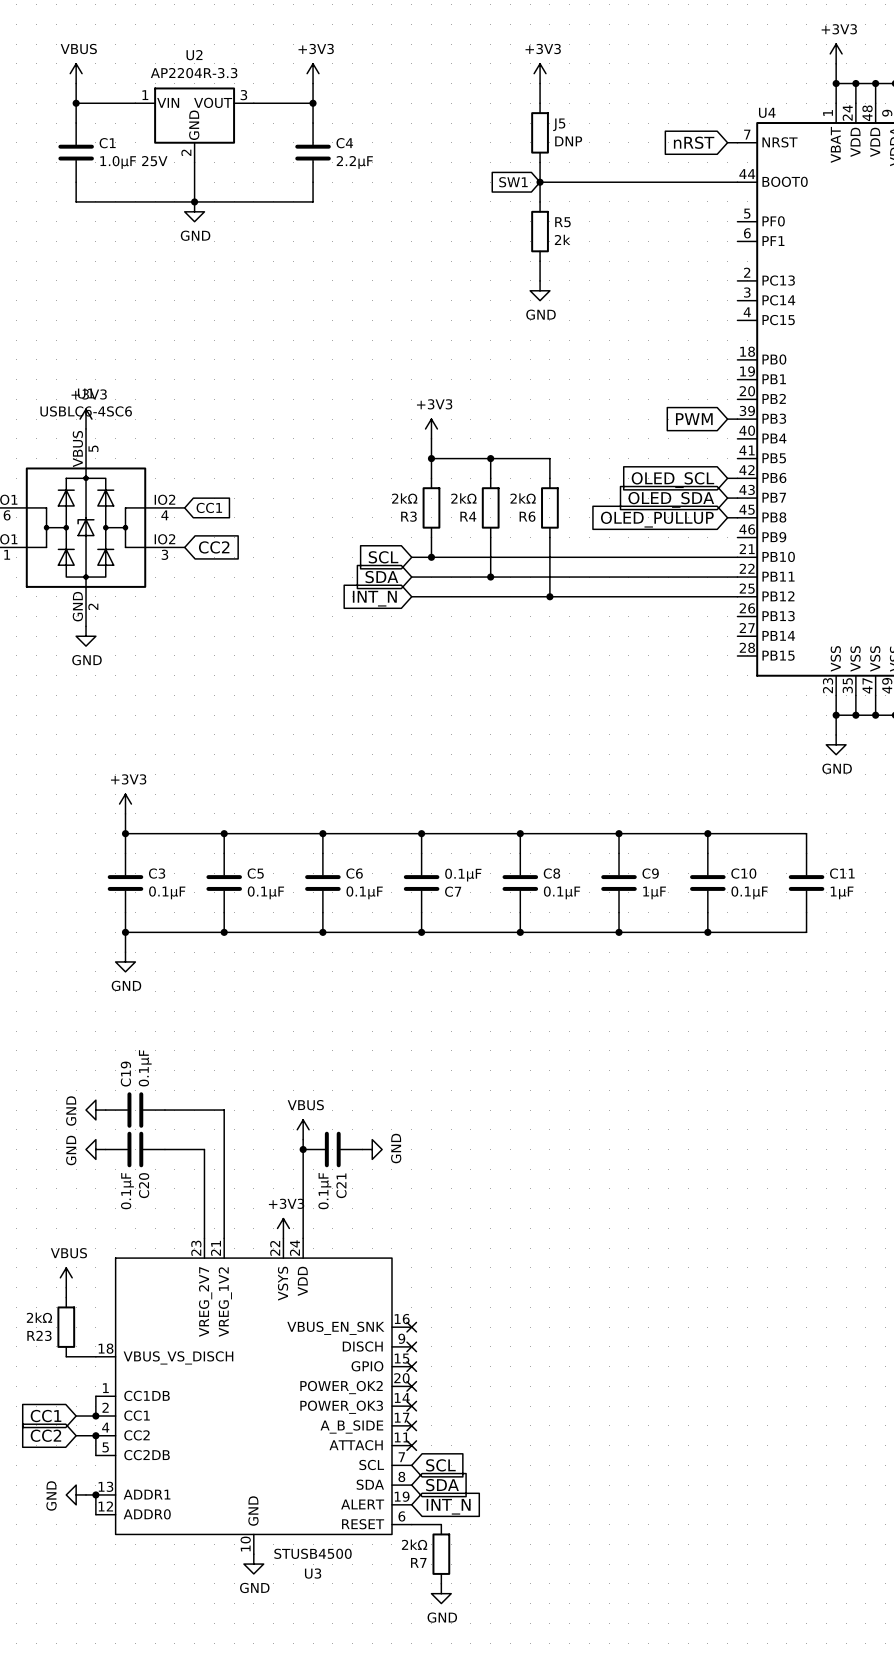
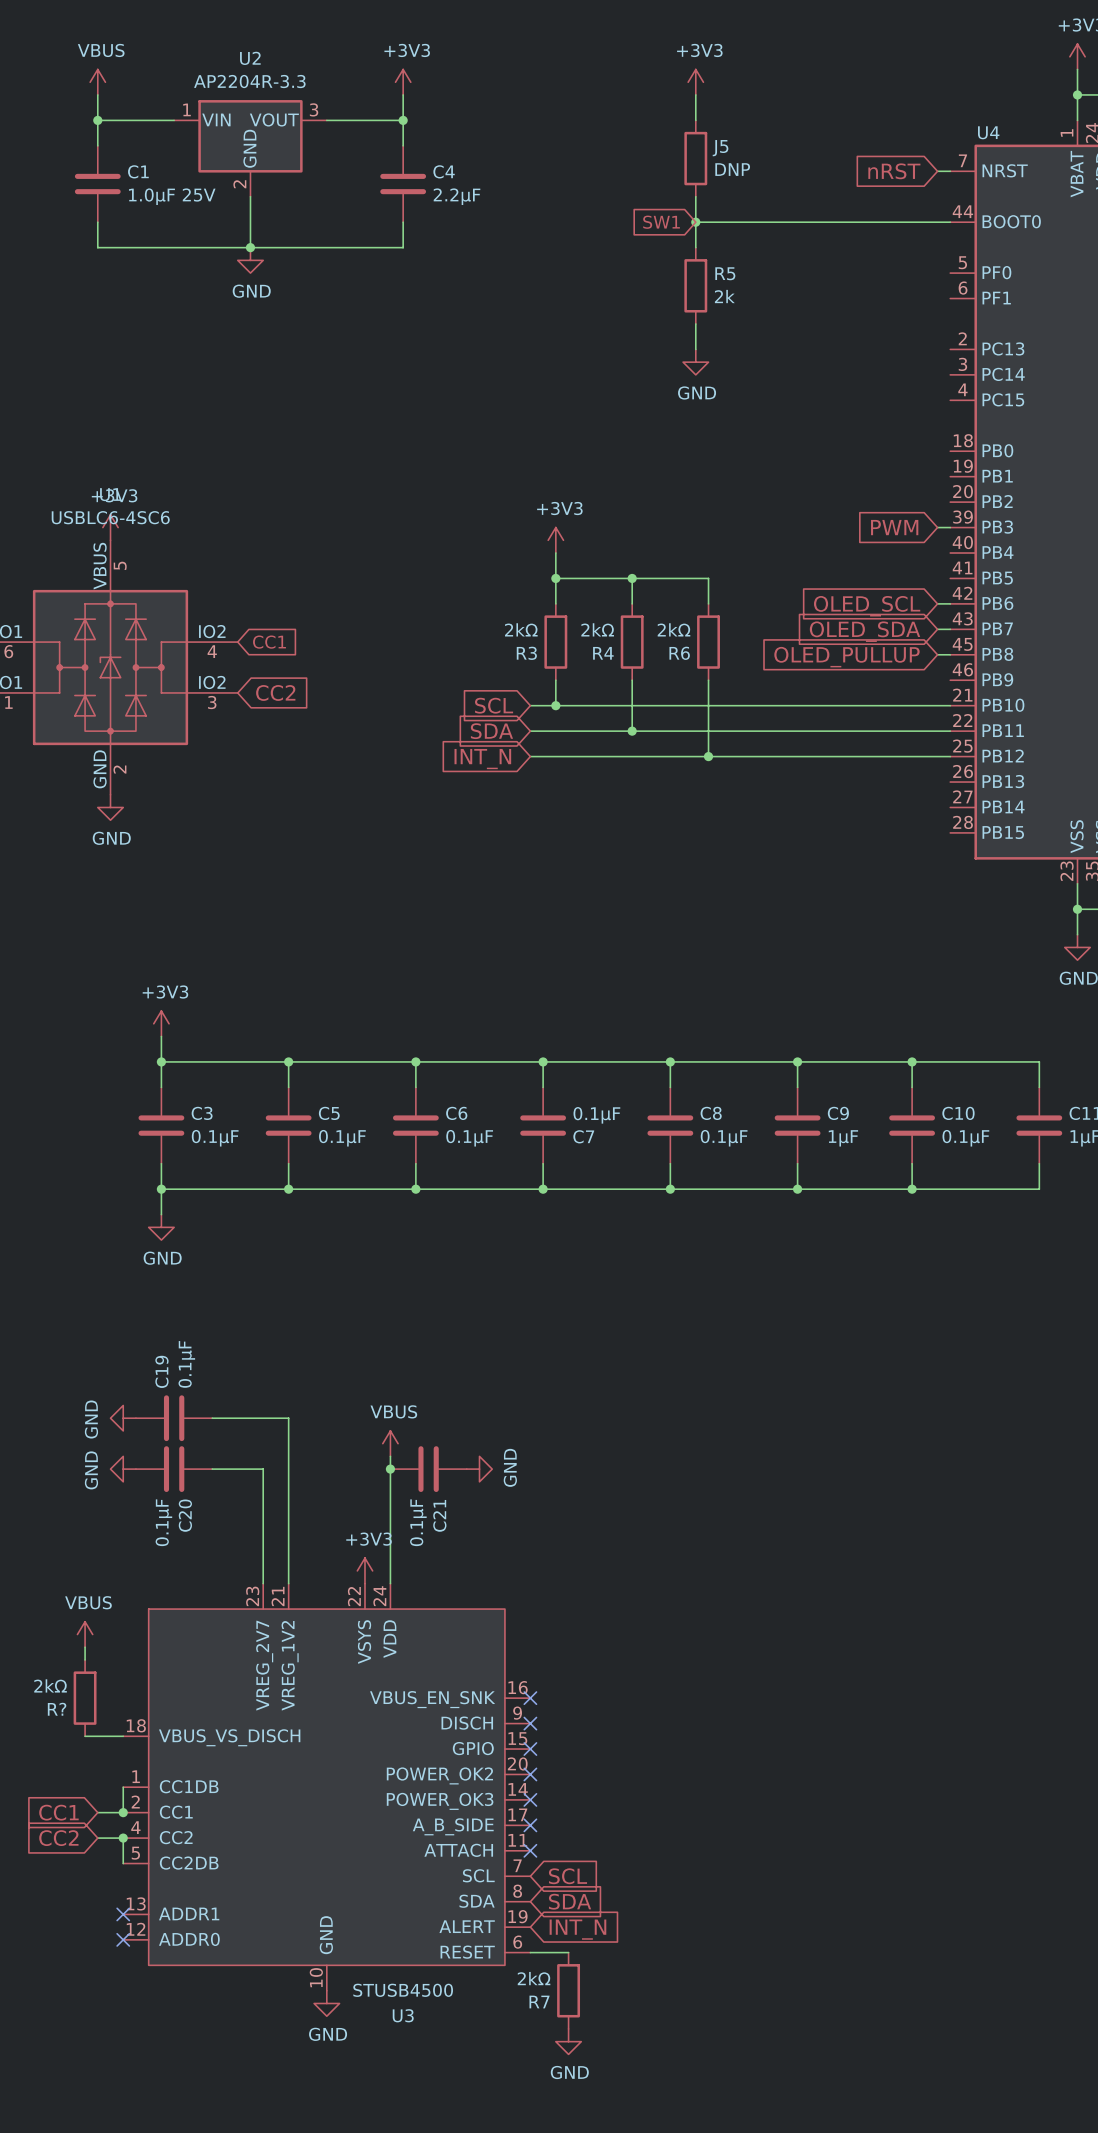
R23 name: R23 (39, 1335) -> R? (57, 1709)
power symbol: GND (76, 1494) -> none
wire: (86, 1494) (95, 1494) (95, 1514) -> none
junction: (95, 1494) -> none
no-connect mark: none -> (123, 1914)
no-connect mark: none -> (123, 1939)

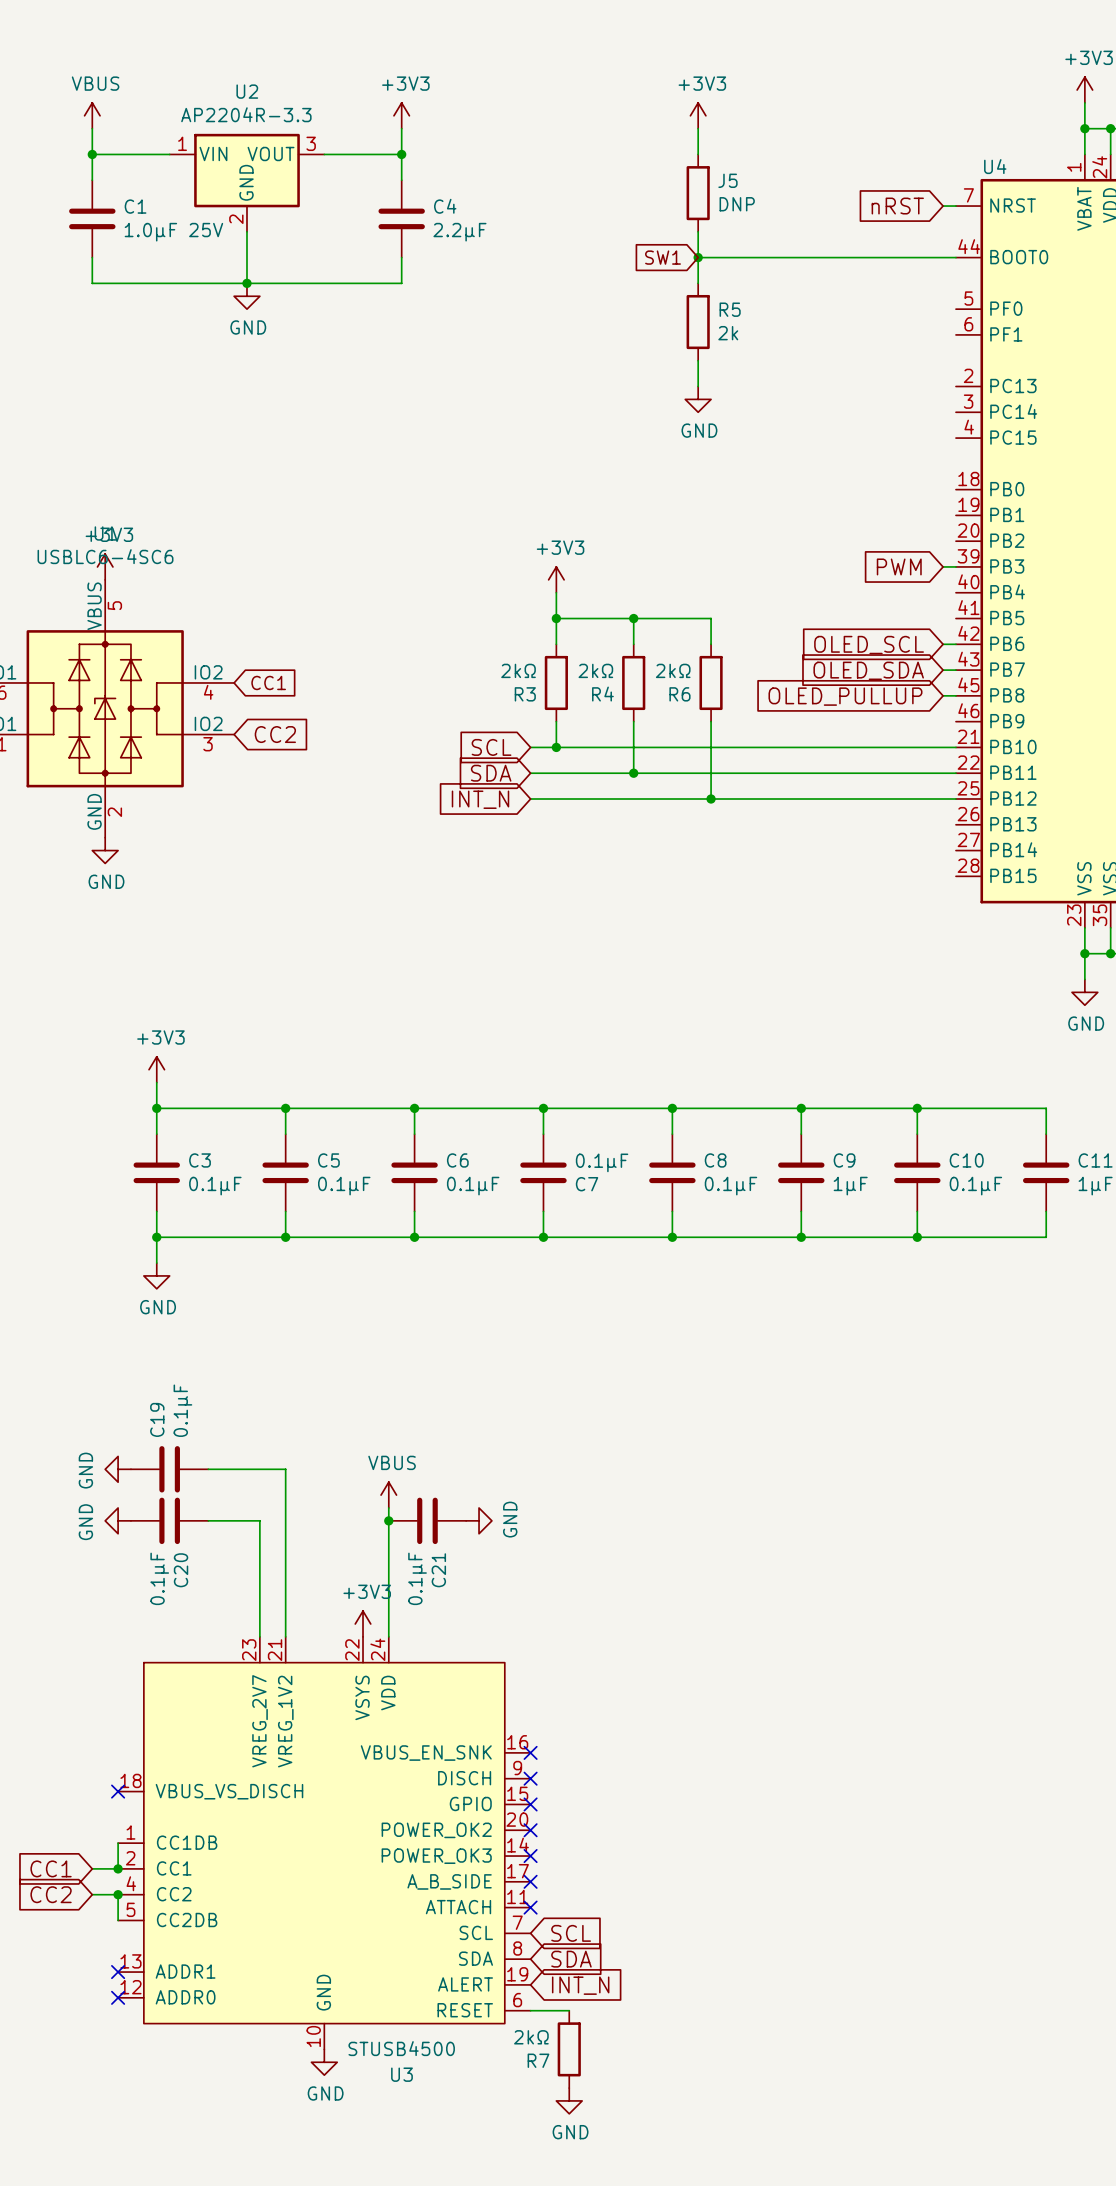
power symbol: VBUS (85, 1634) -> none
wire: (85, 1647) (85, 1659) -> none
R?: 2kΩ (85, 1698) -> none
wire: (85, 1736) (123, 1736) -> none
no-connect mark: none -> (118, 1791)

